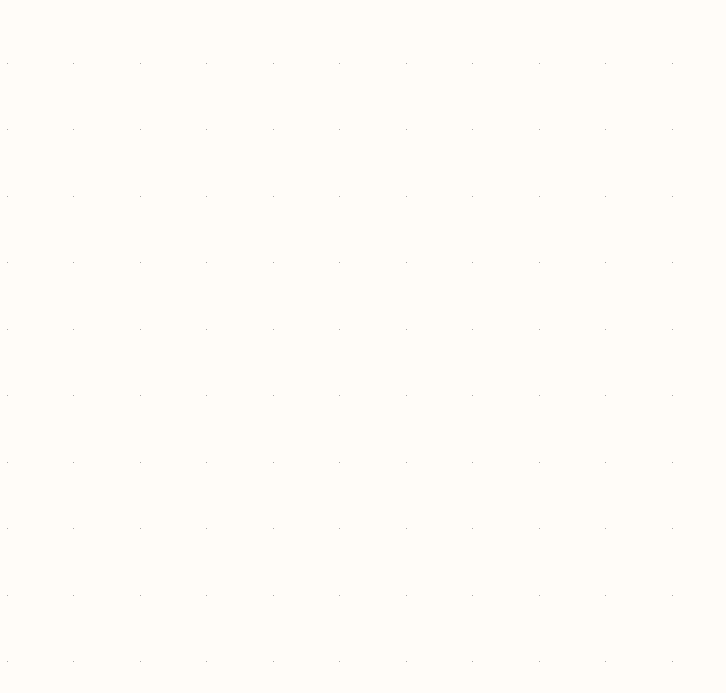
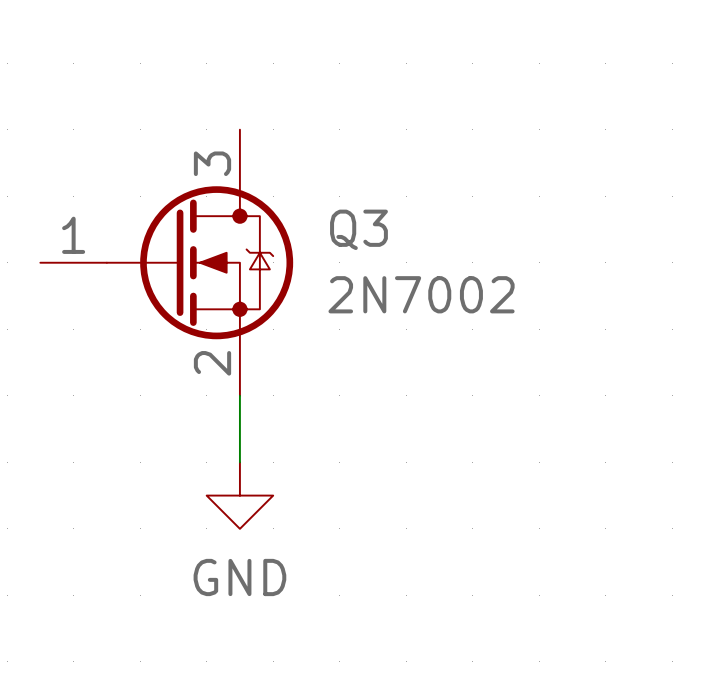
Q3: none -> 2N7002 (166, 262)
wire: none -> (239, 395) (239, 462)
power symbol: none -> GND (239, 495)

